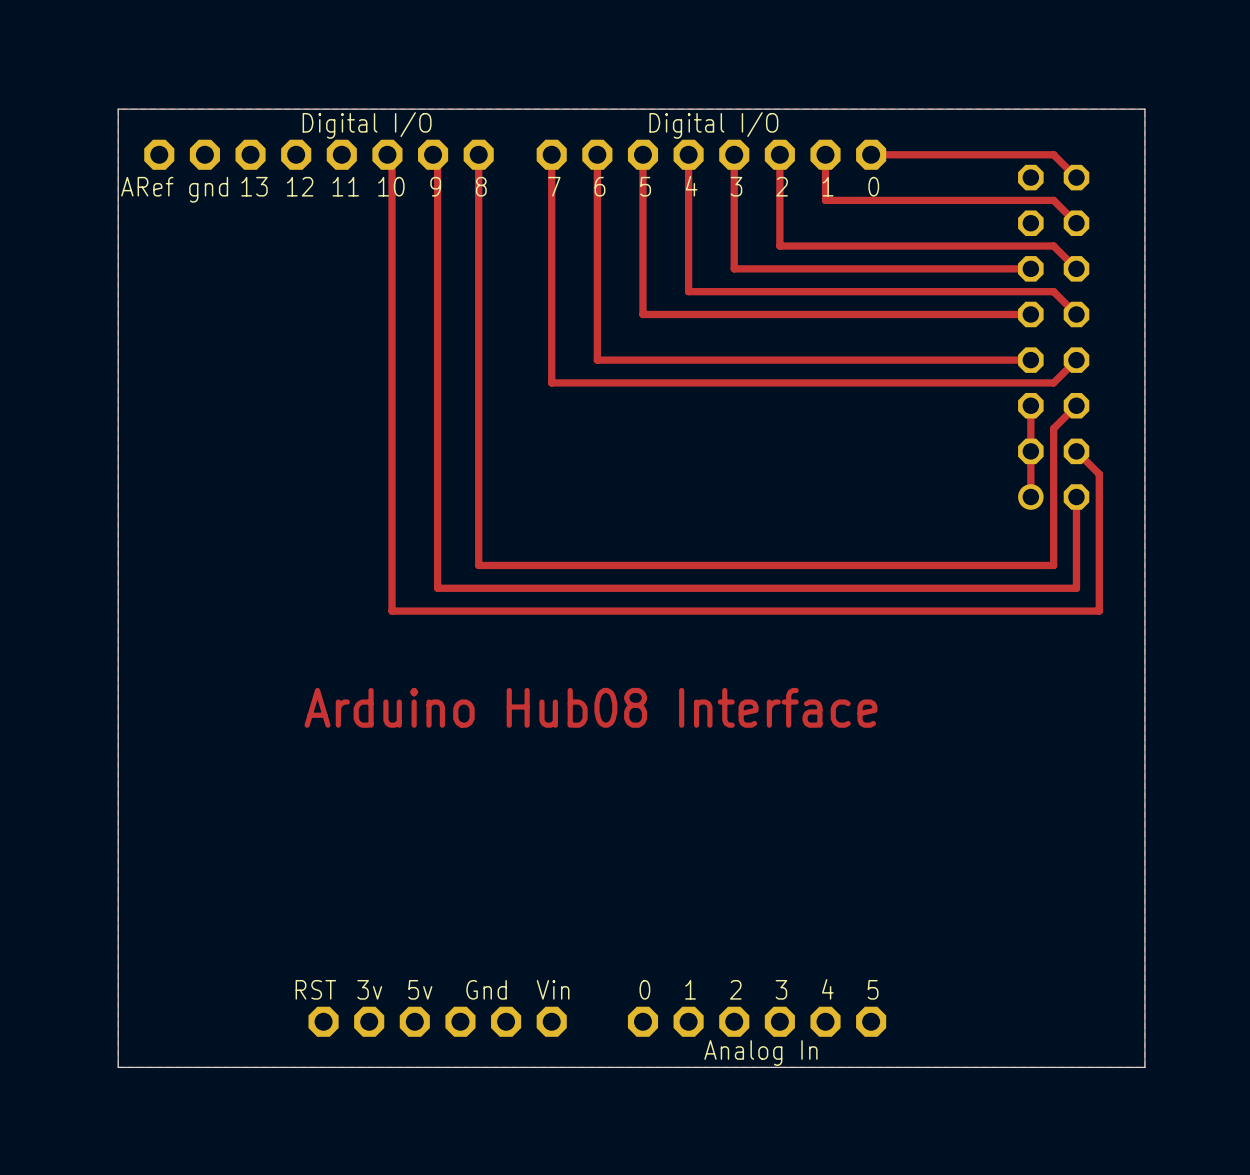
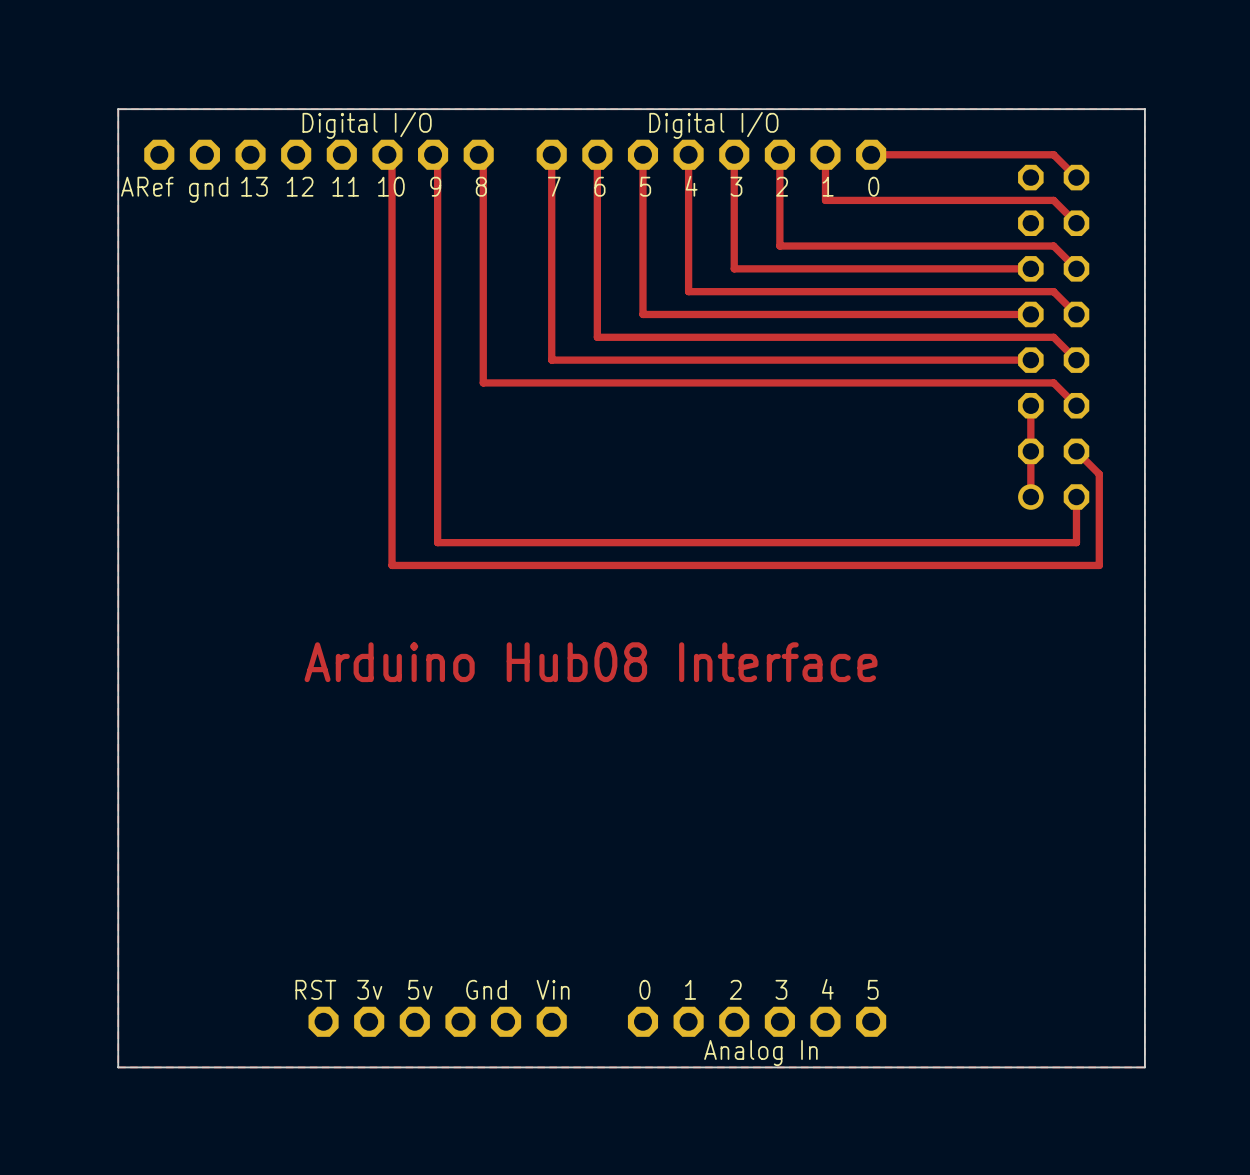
track: (478, 154) (478, 565) -> (478, 154) (483, 154) (483, 382) (551, 382)
track: (597, 337) (597, 360) -> (597, 337) (1053, 337) (1076, 360)
track: (551, 360) (551, 382) -> (551, 360) (597, 360)
track: (1076, 360) (1053, 382) -> (1076, 405) (1053, 382)
track: (1076, 405) (1053, 428) (1053, 565) -> (1099, 565) (1053, 565)
track: (437, 542) (437, 588) (1076, 588) (1076, 542) -> (437, 542) (1076, 542)
track: (392, 565) (392, 611) (1099, 611) (1099, 565) -> (392, 565) (478, 565)
text position: Arduino Hub08 Interface (591, 707) -> Arduino Hub08 Interface (591, 662)

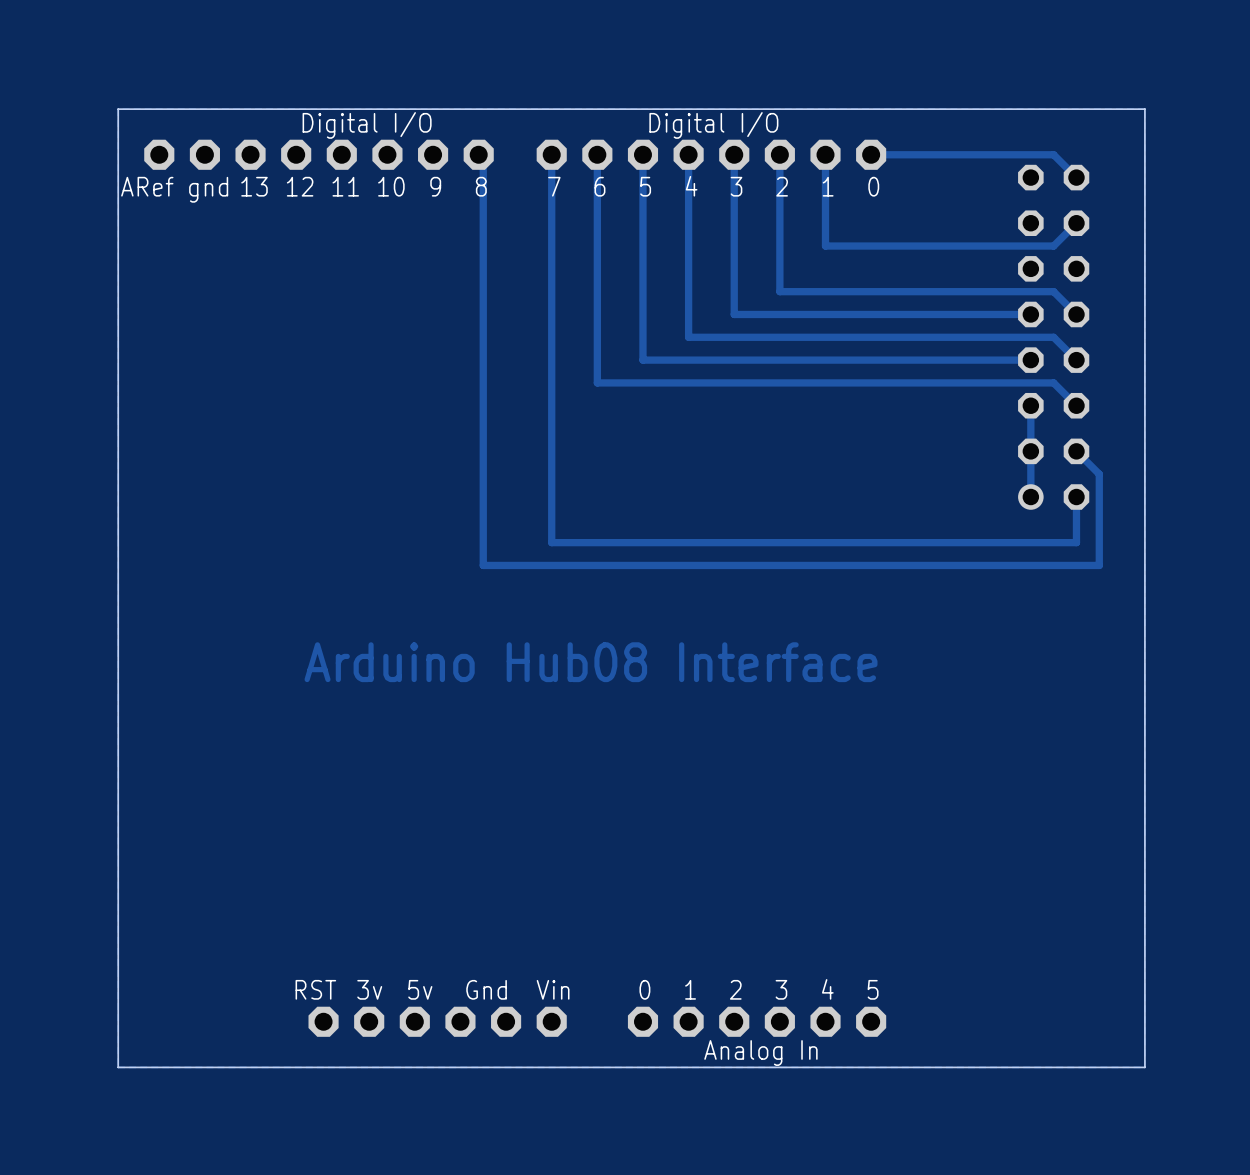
track: (387, 154) (392, 154) (392, 565) (483, 565) -> (483, 382) (483, 565)
track: (433, 154) (437, 154) (437, 542) (551, 542) -> (551, 360) (551, 542)
track: (825, 200) (1053, 200) (1076, 223) -> none
track: (779, 246) (825, 246) -> (825, 200) (825, 246)
track: (1053, 246) (1076, 268) -> (1053, 246) (1076, 223)
track: (734, 268) (1030, 268) -> none
track: (688, 291) (779, 291) -> (779, 246) (779, 291)
track: (642, 314) (734, 314) -> (734, 268) (734, 314)
track: (597, 337) (688, 337) -> (688, 291) (688, 337)
track: (551, 360) (642, 360) -> (642, 314) (642, 360)
track: (483, 382) (597, 382) -> (597, 337) (597, 382)

